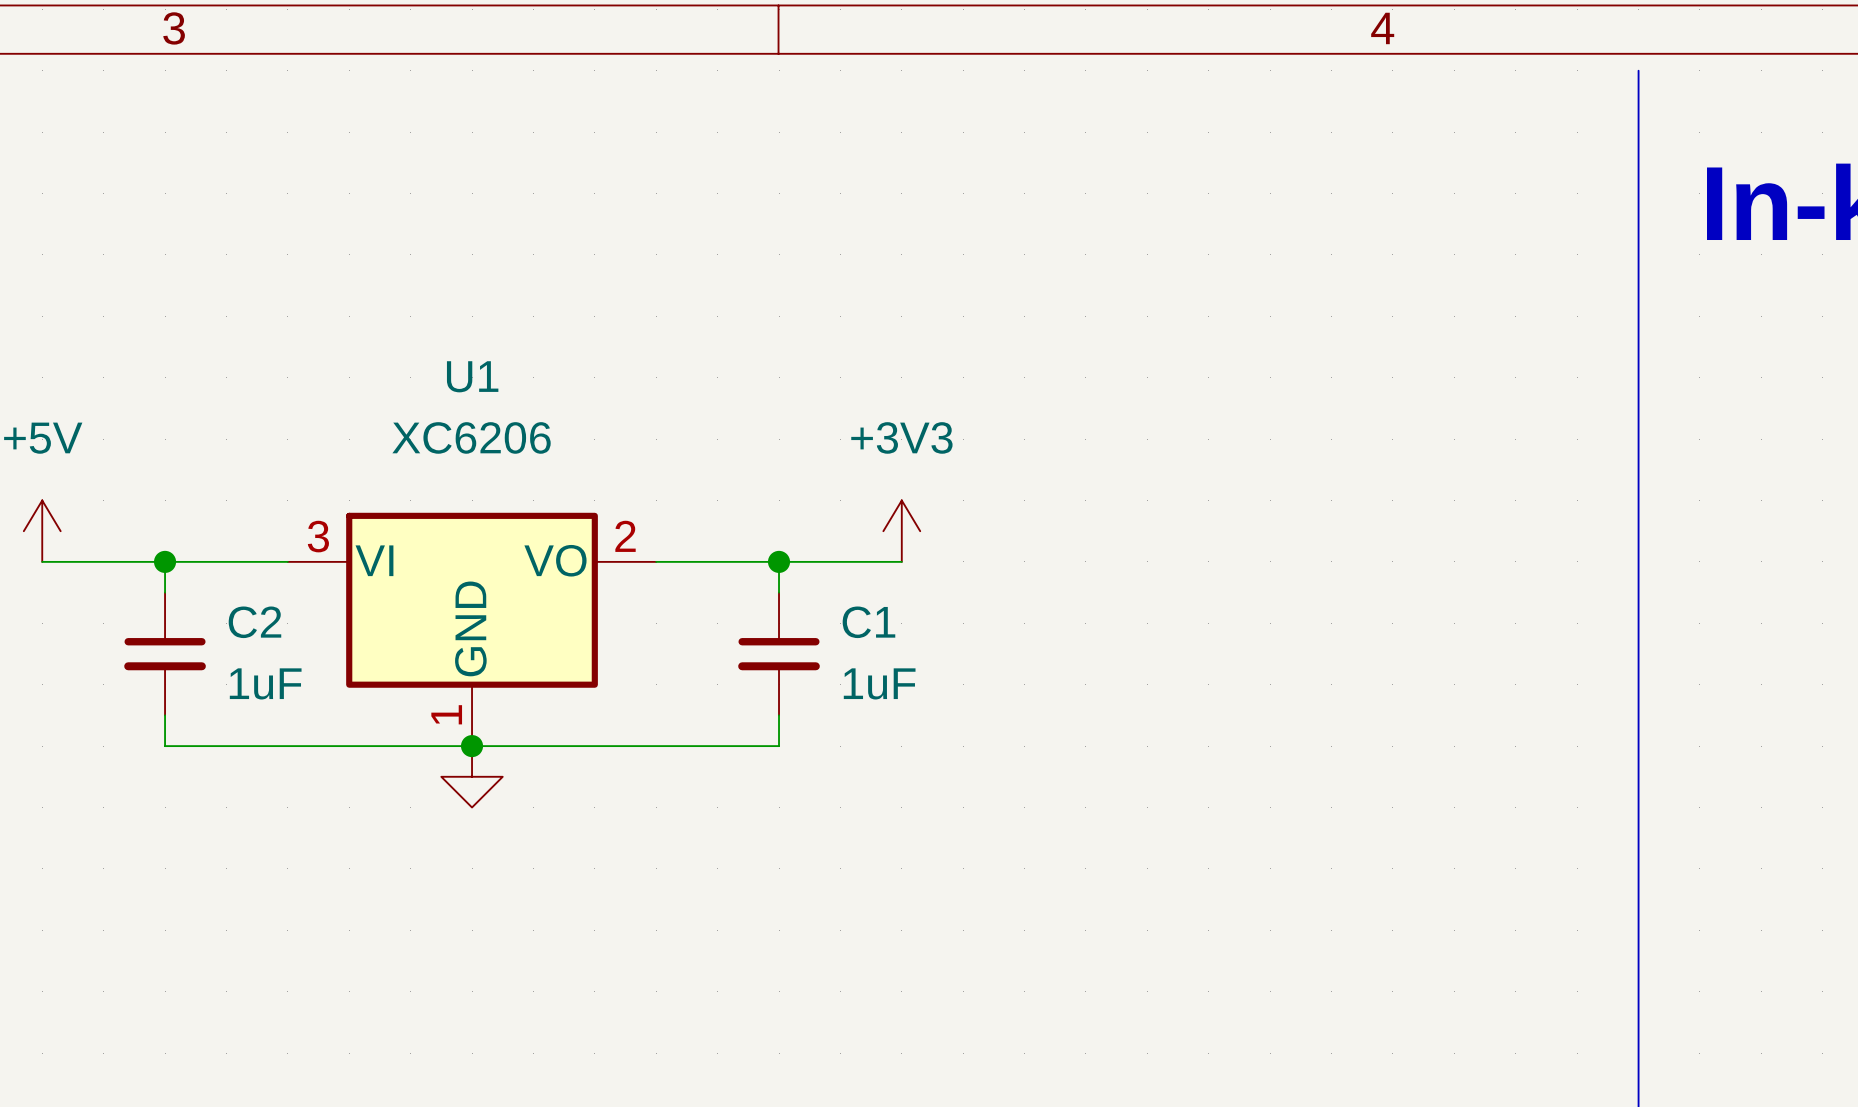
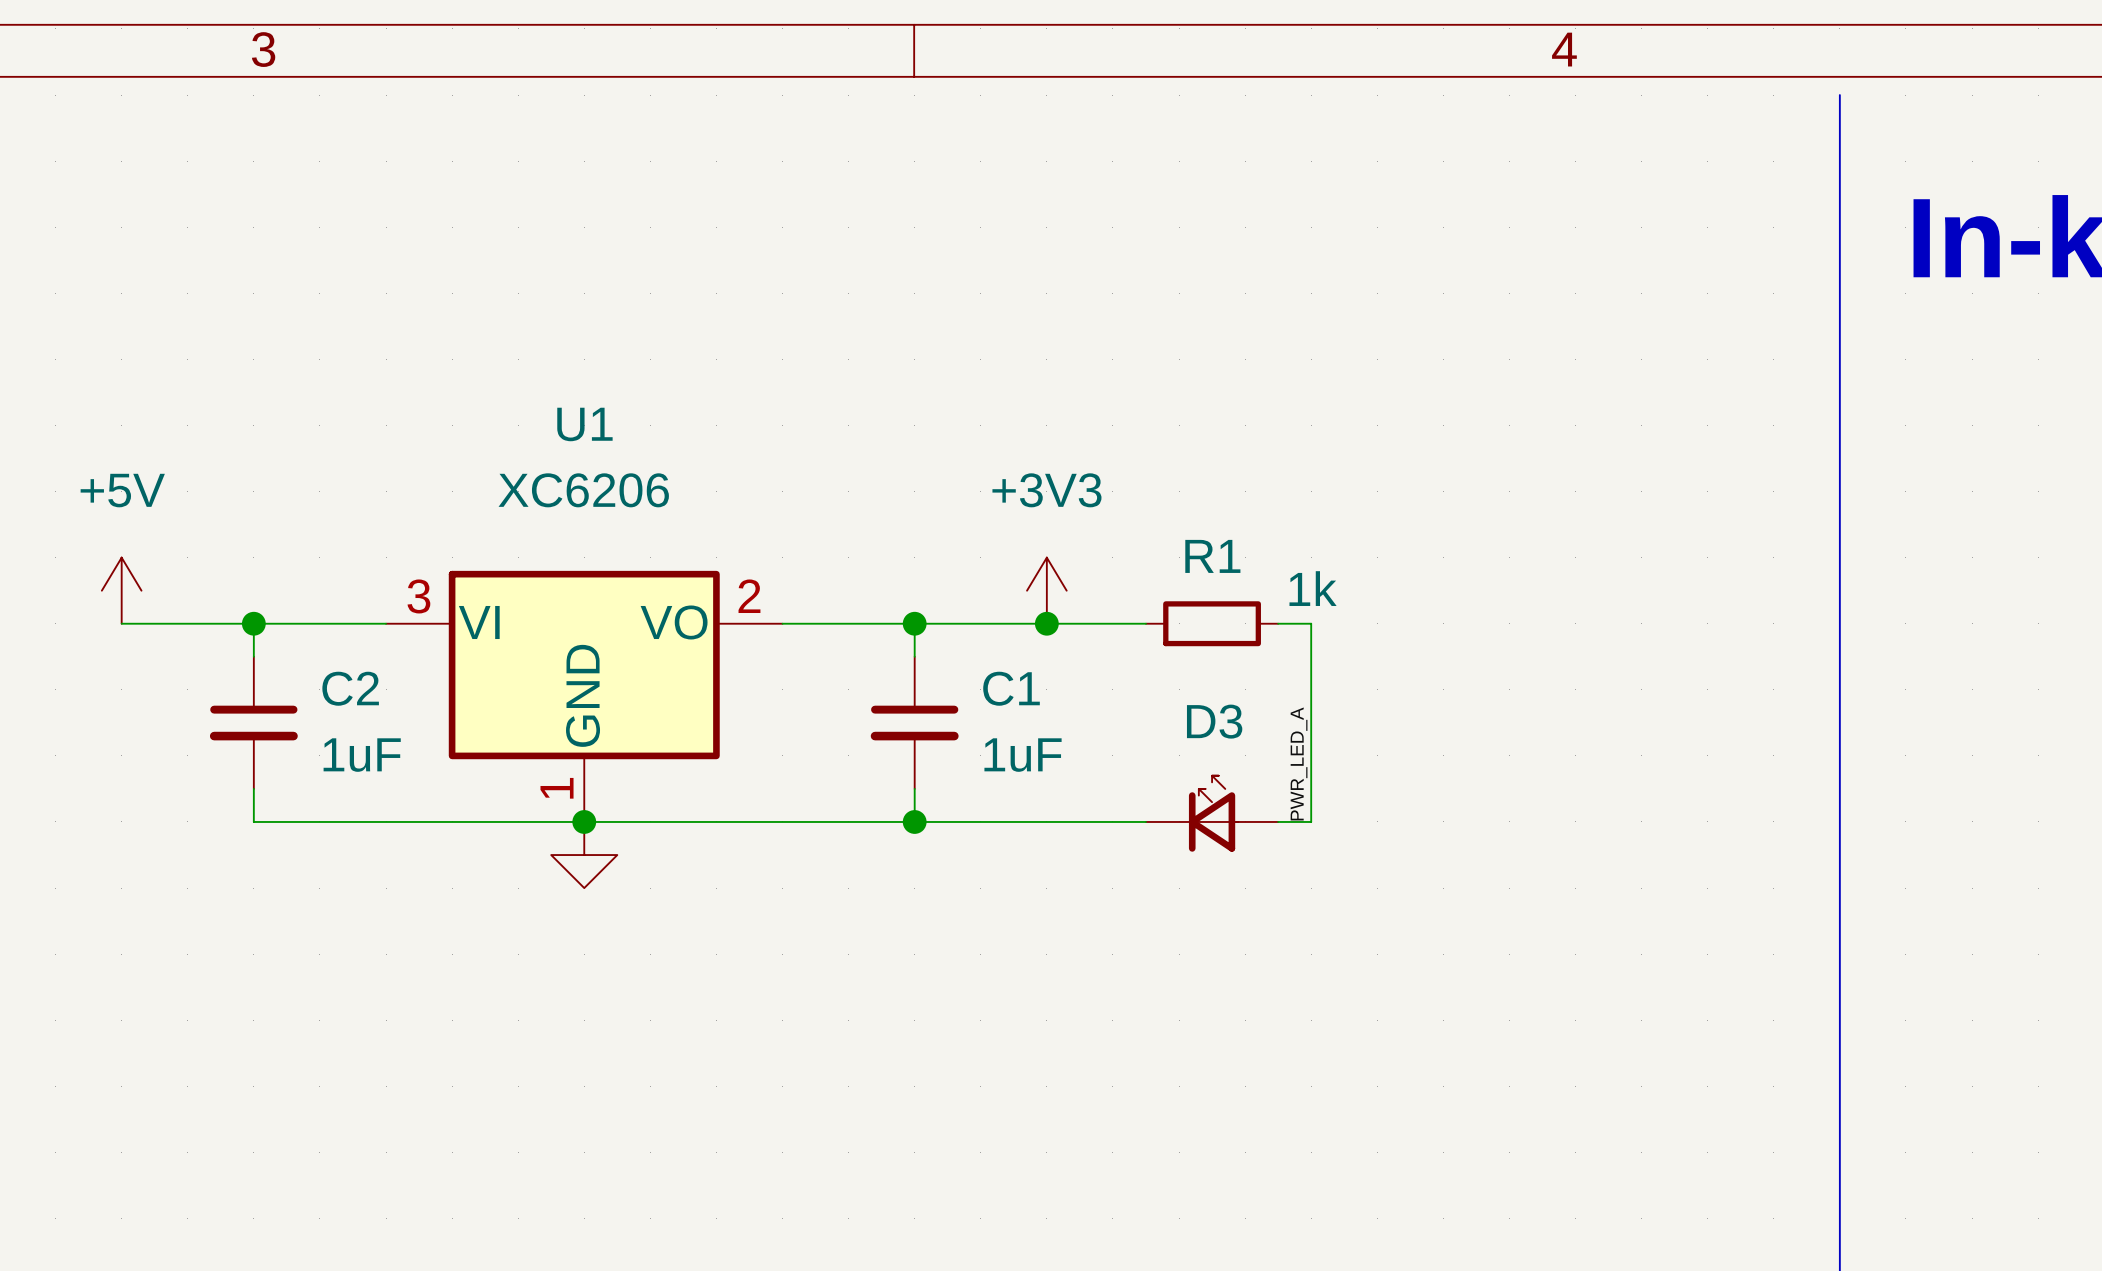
wire: none -> (1046, 623) (1145, 623)
junction: none -> (1046, 623)
R1: none -> 1k (1212, 623)
wire: none -> (1278, 623) (1311, 623) (1311, 821) (1278, 821)
label: none -> PWR_LED_A (1299, 763)
D3: none -> (1212, 813)
wire: none -> (914, 821) (1145, 821)
junction: none -> (914, 821)

